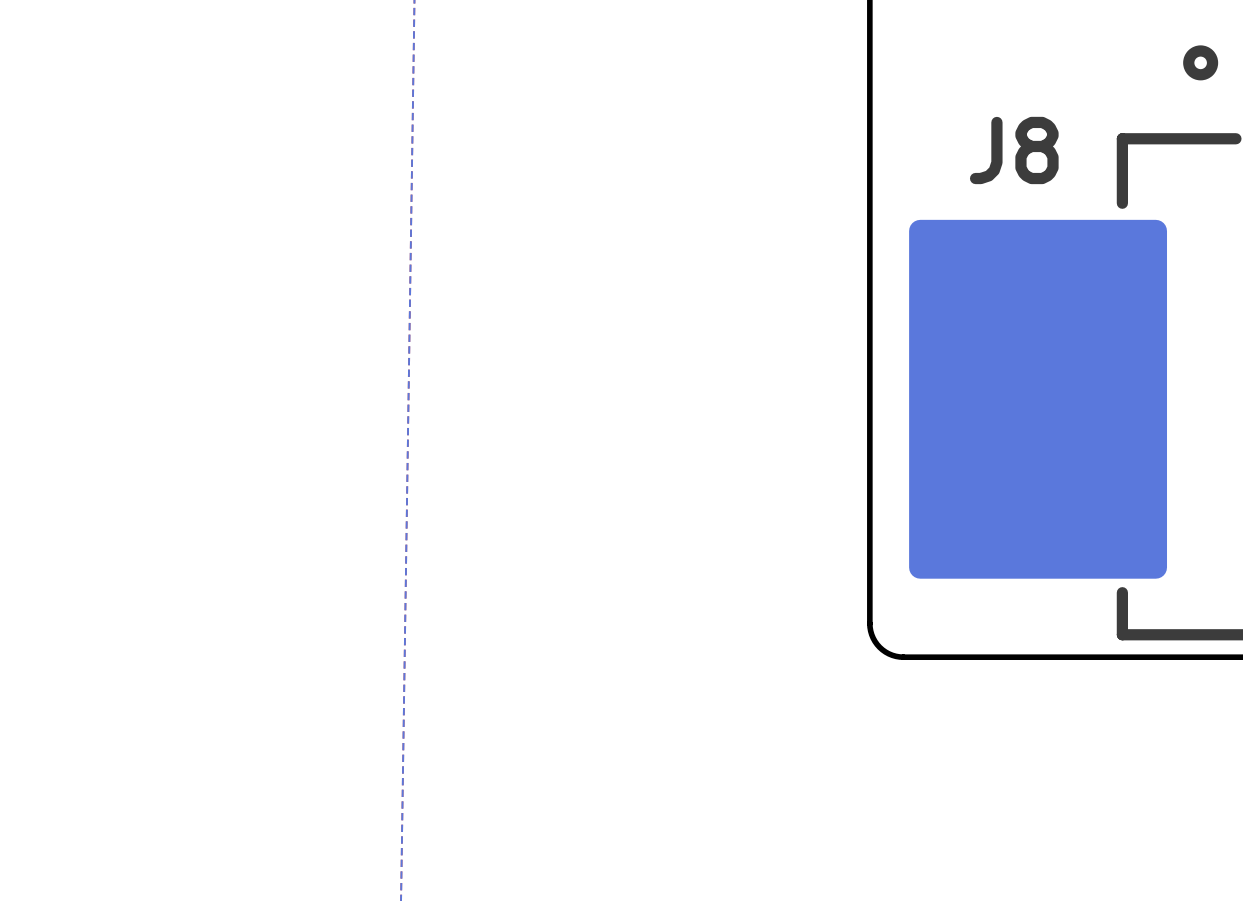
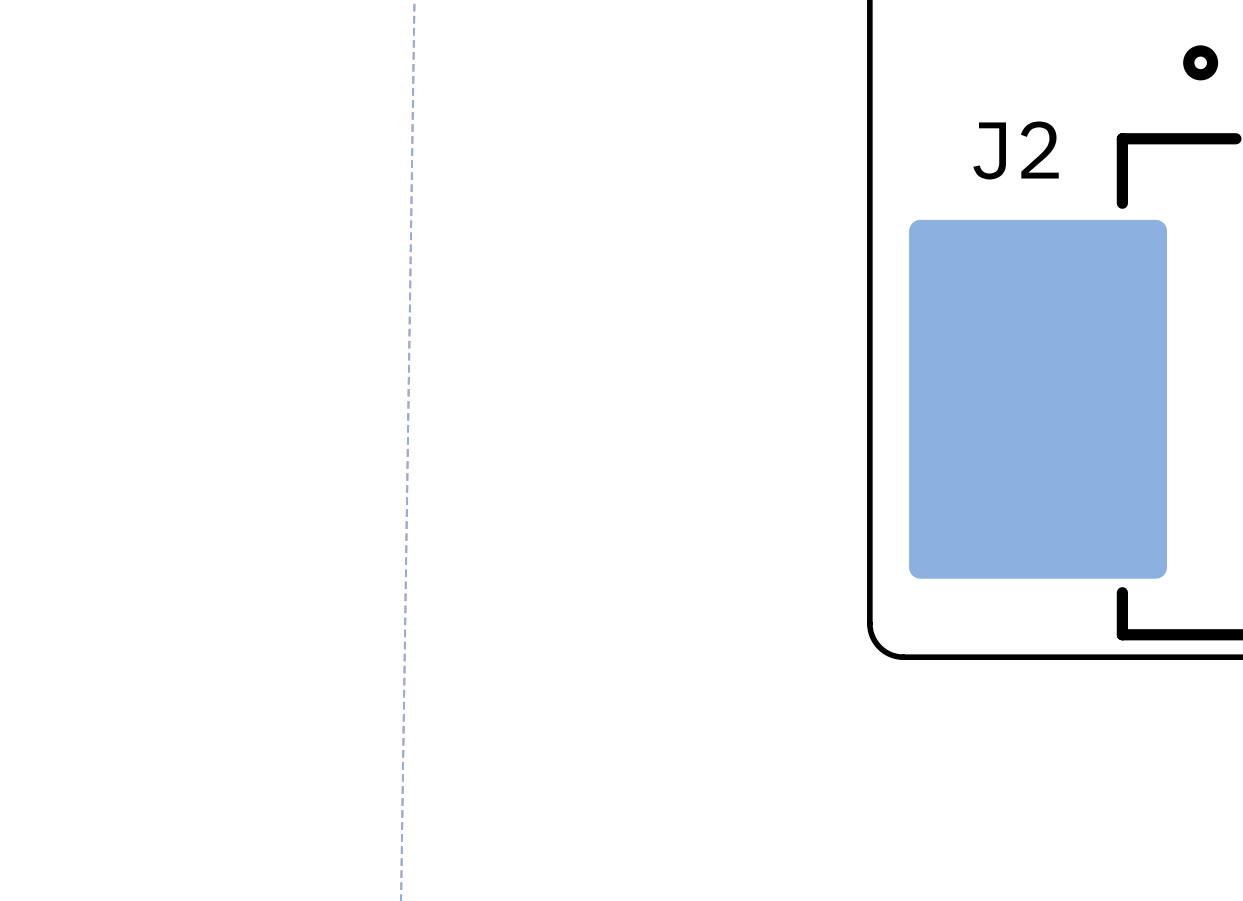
J8 name: J8 (1014, 150) -> J2 (1016, 150)

